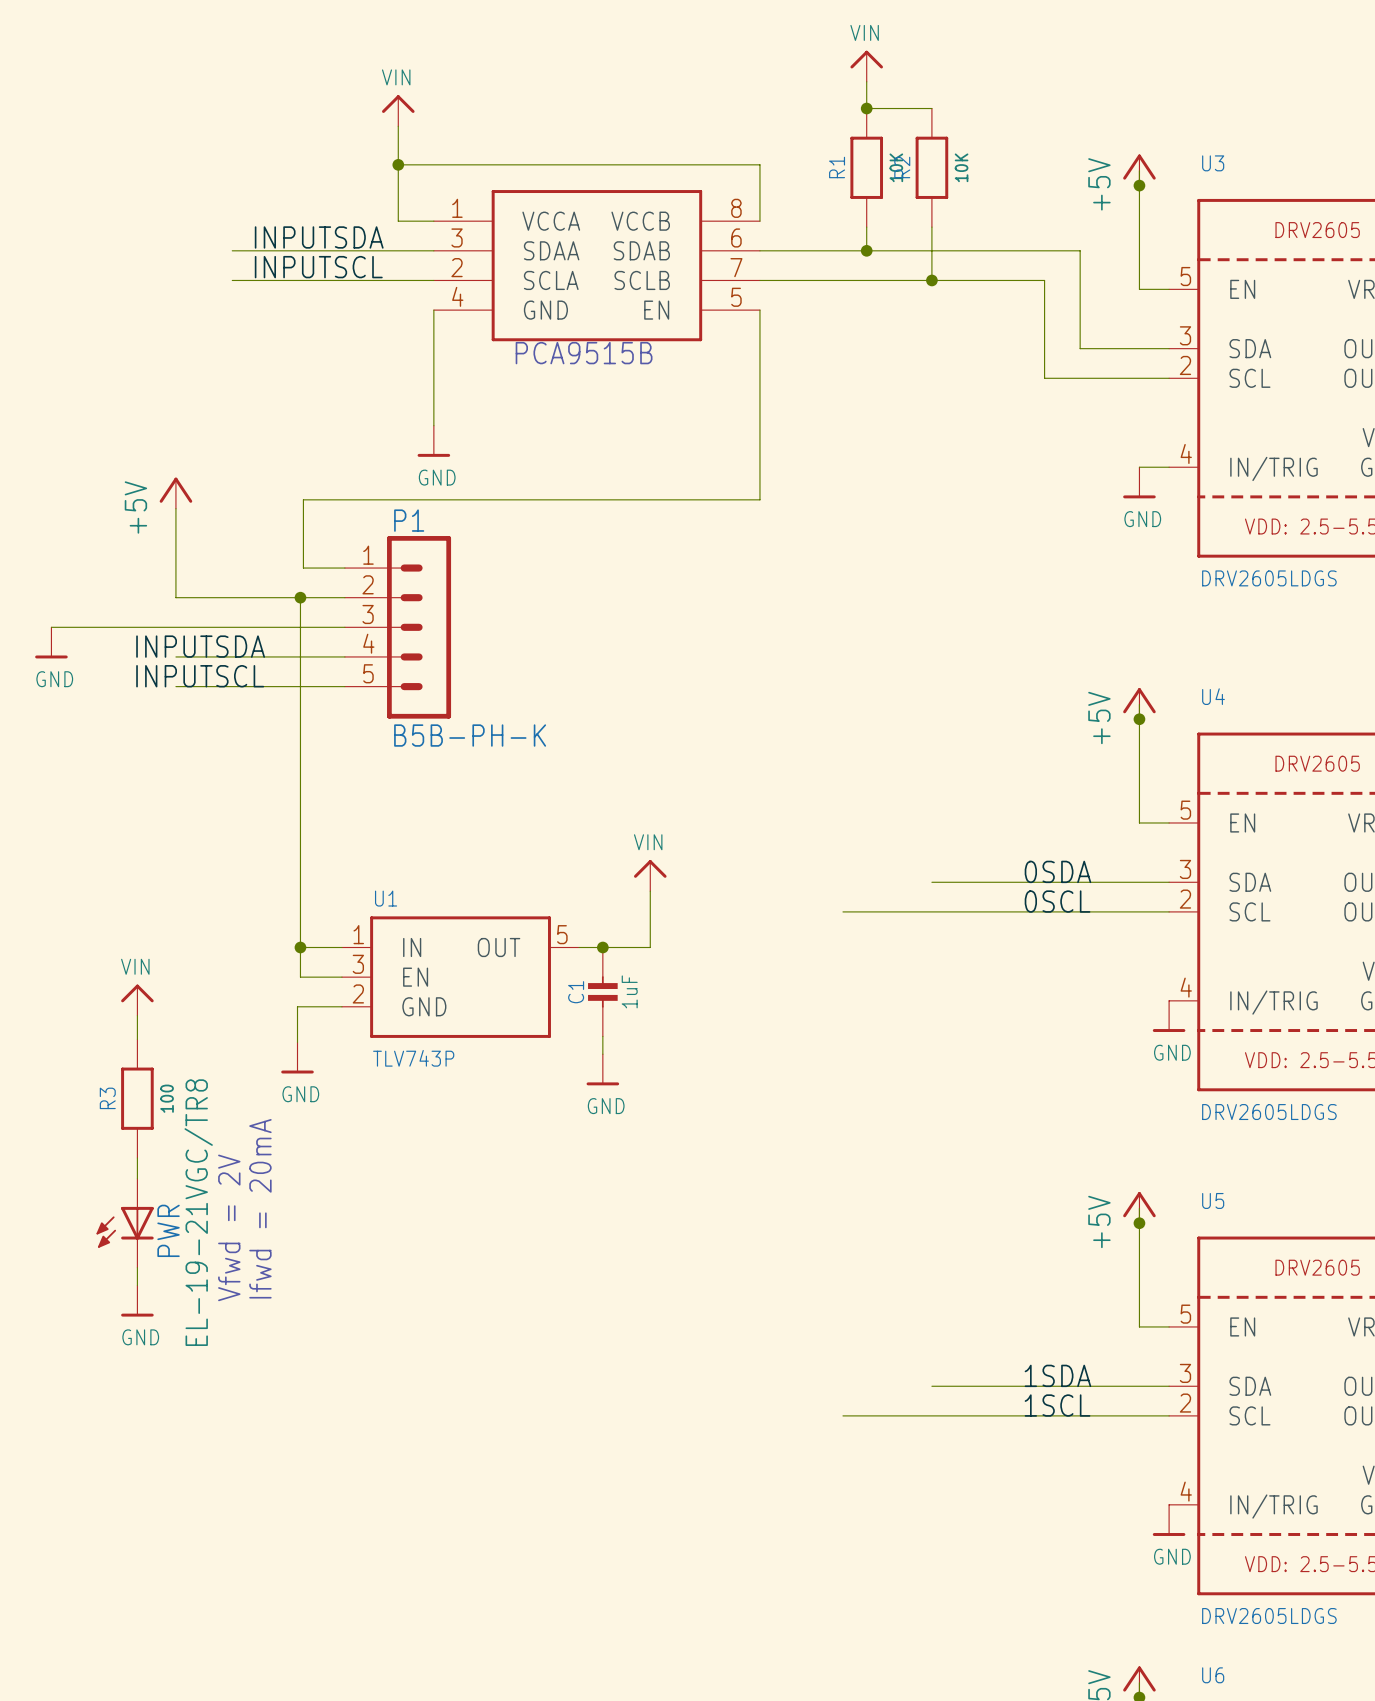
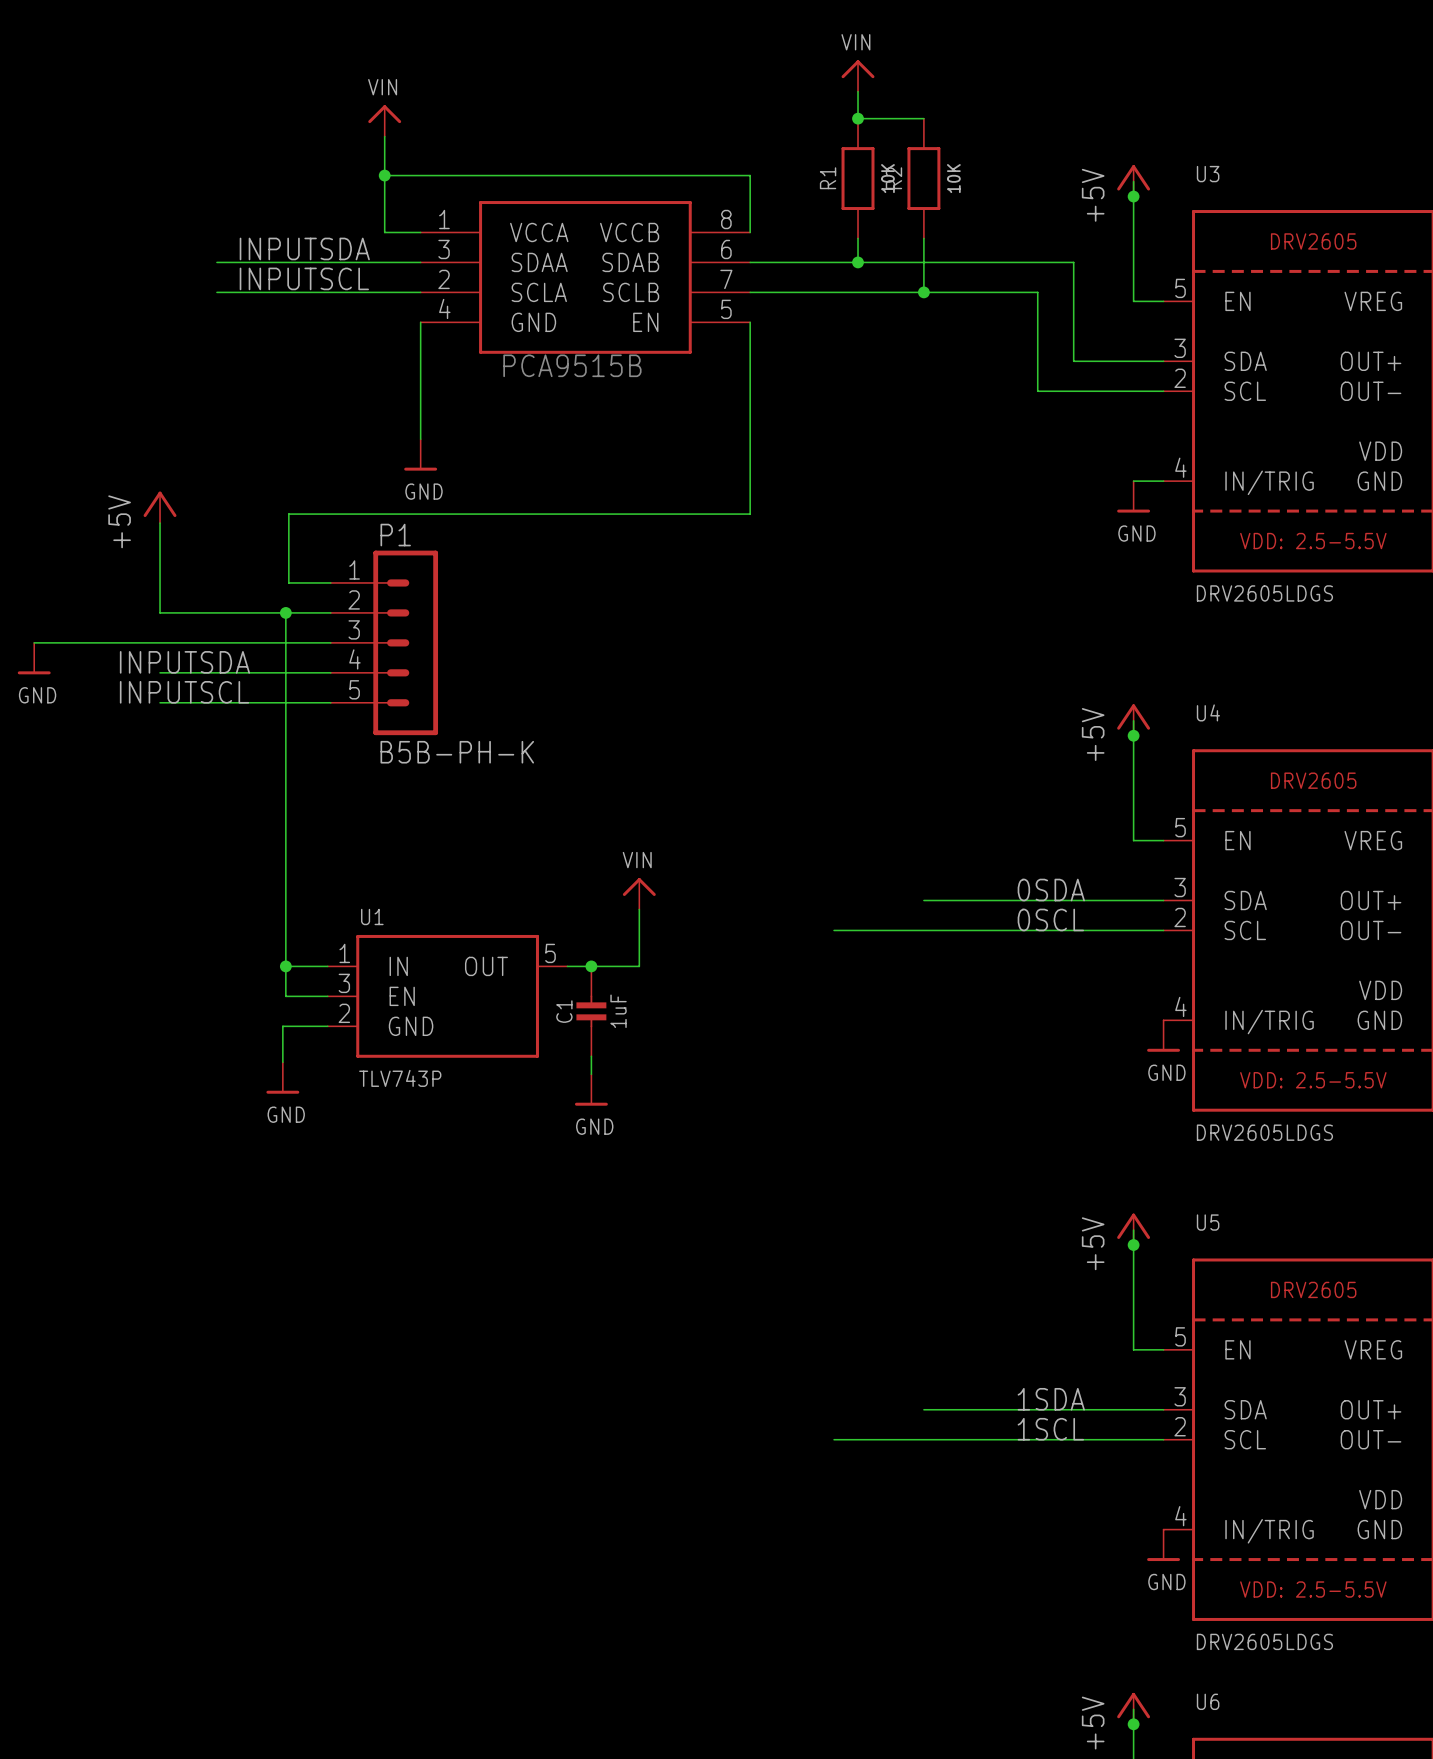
power symbol: VIN (137, 1000) -> none
wire: (137, 1015) (137, 1039) -> none
R3: 100 (137, 1098) -> none
wire: (137, 1157) (137, 1178) -> none
text: Ifwd = 20mA (260, 1208) -> none
PWR: EL-19-21VGC/TR8 (125, 1223) -> none
text: Vfwd = 2V (229, 1227) -> none
wire: (137, 1267) (137, 1285) -> none
power symbol: GND (137, 1301) -> none

